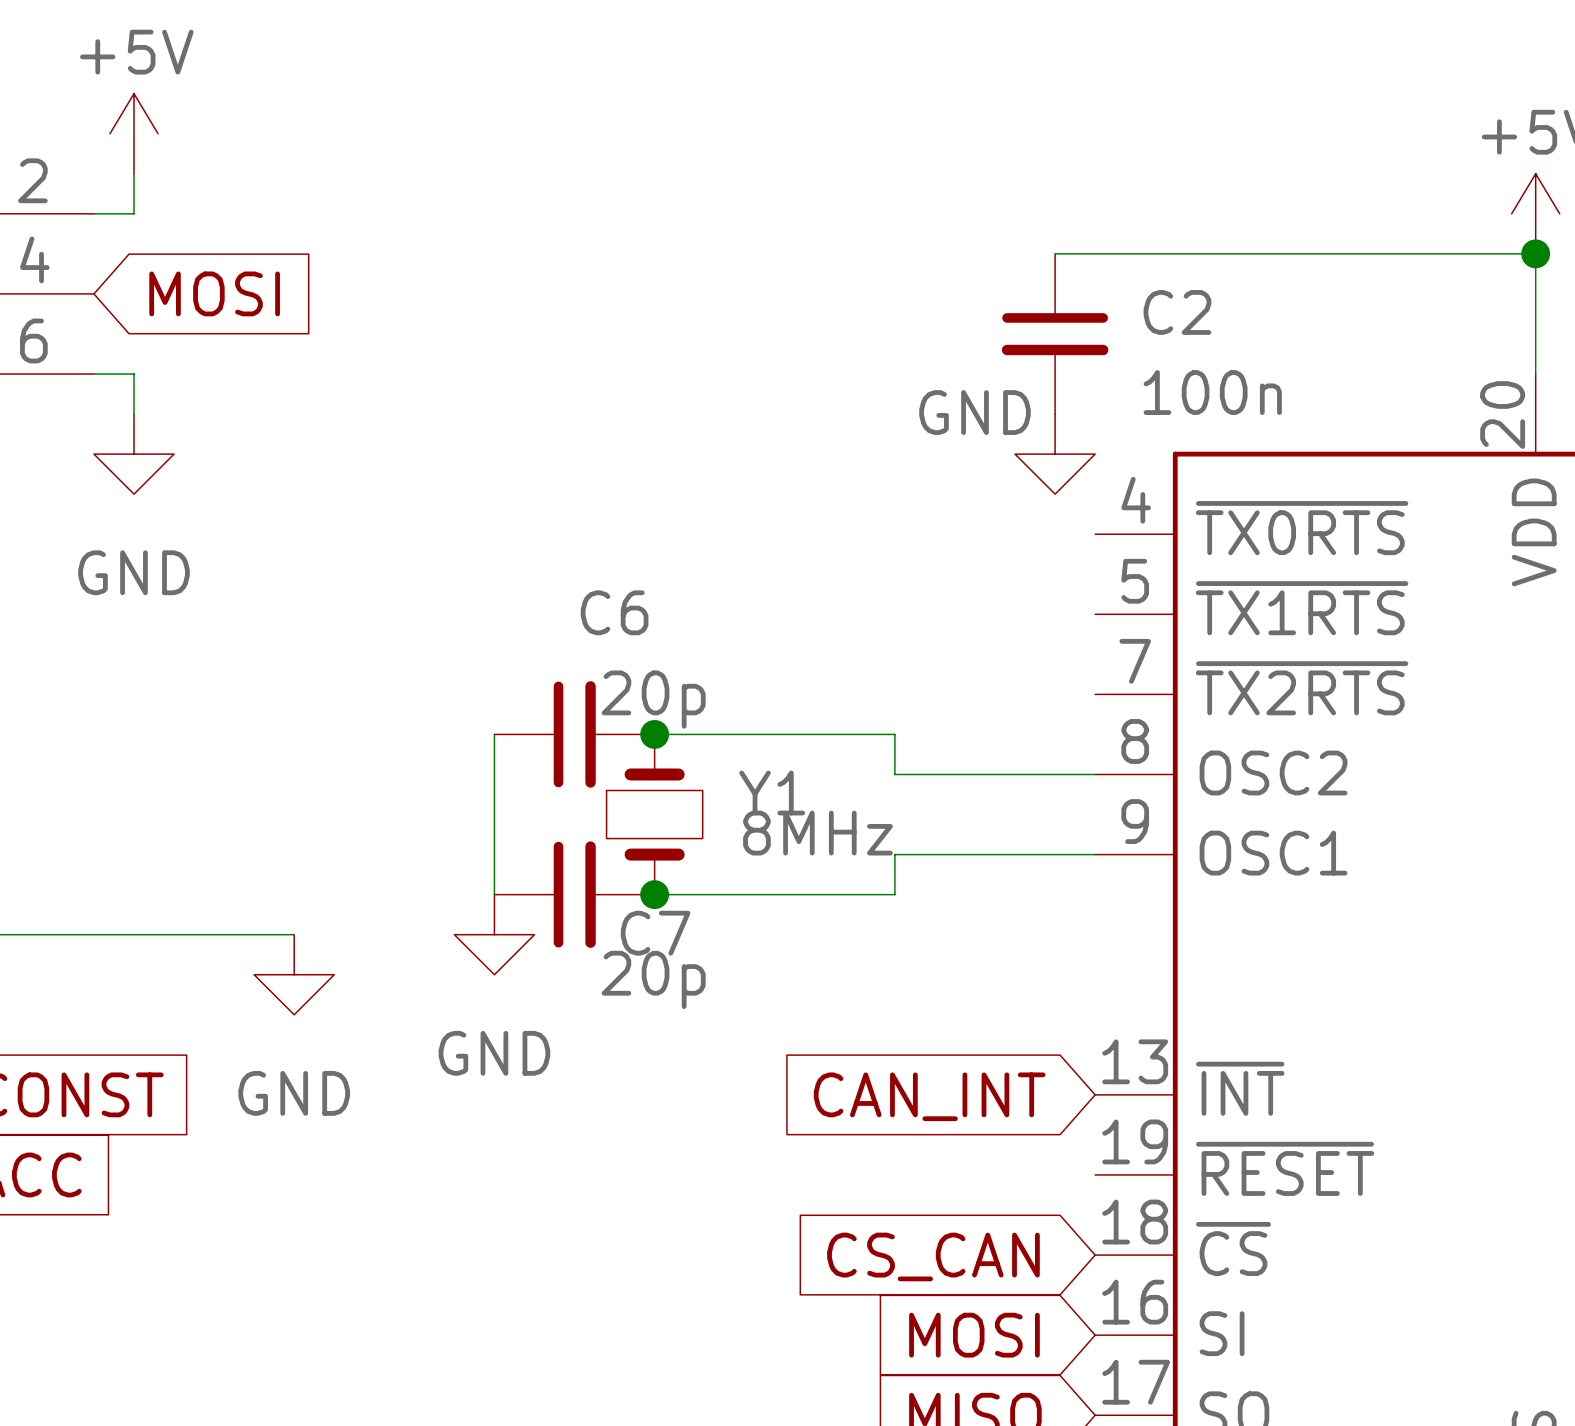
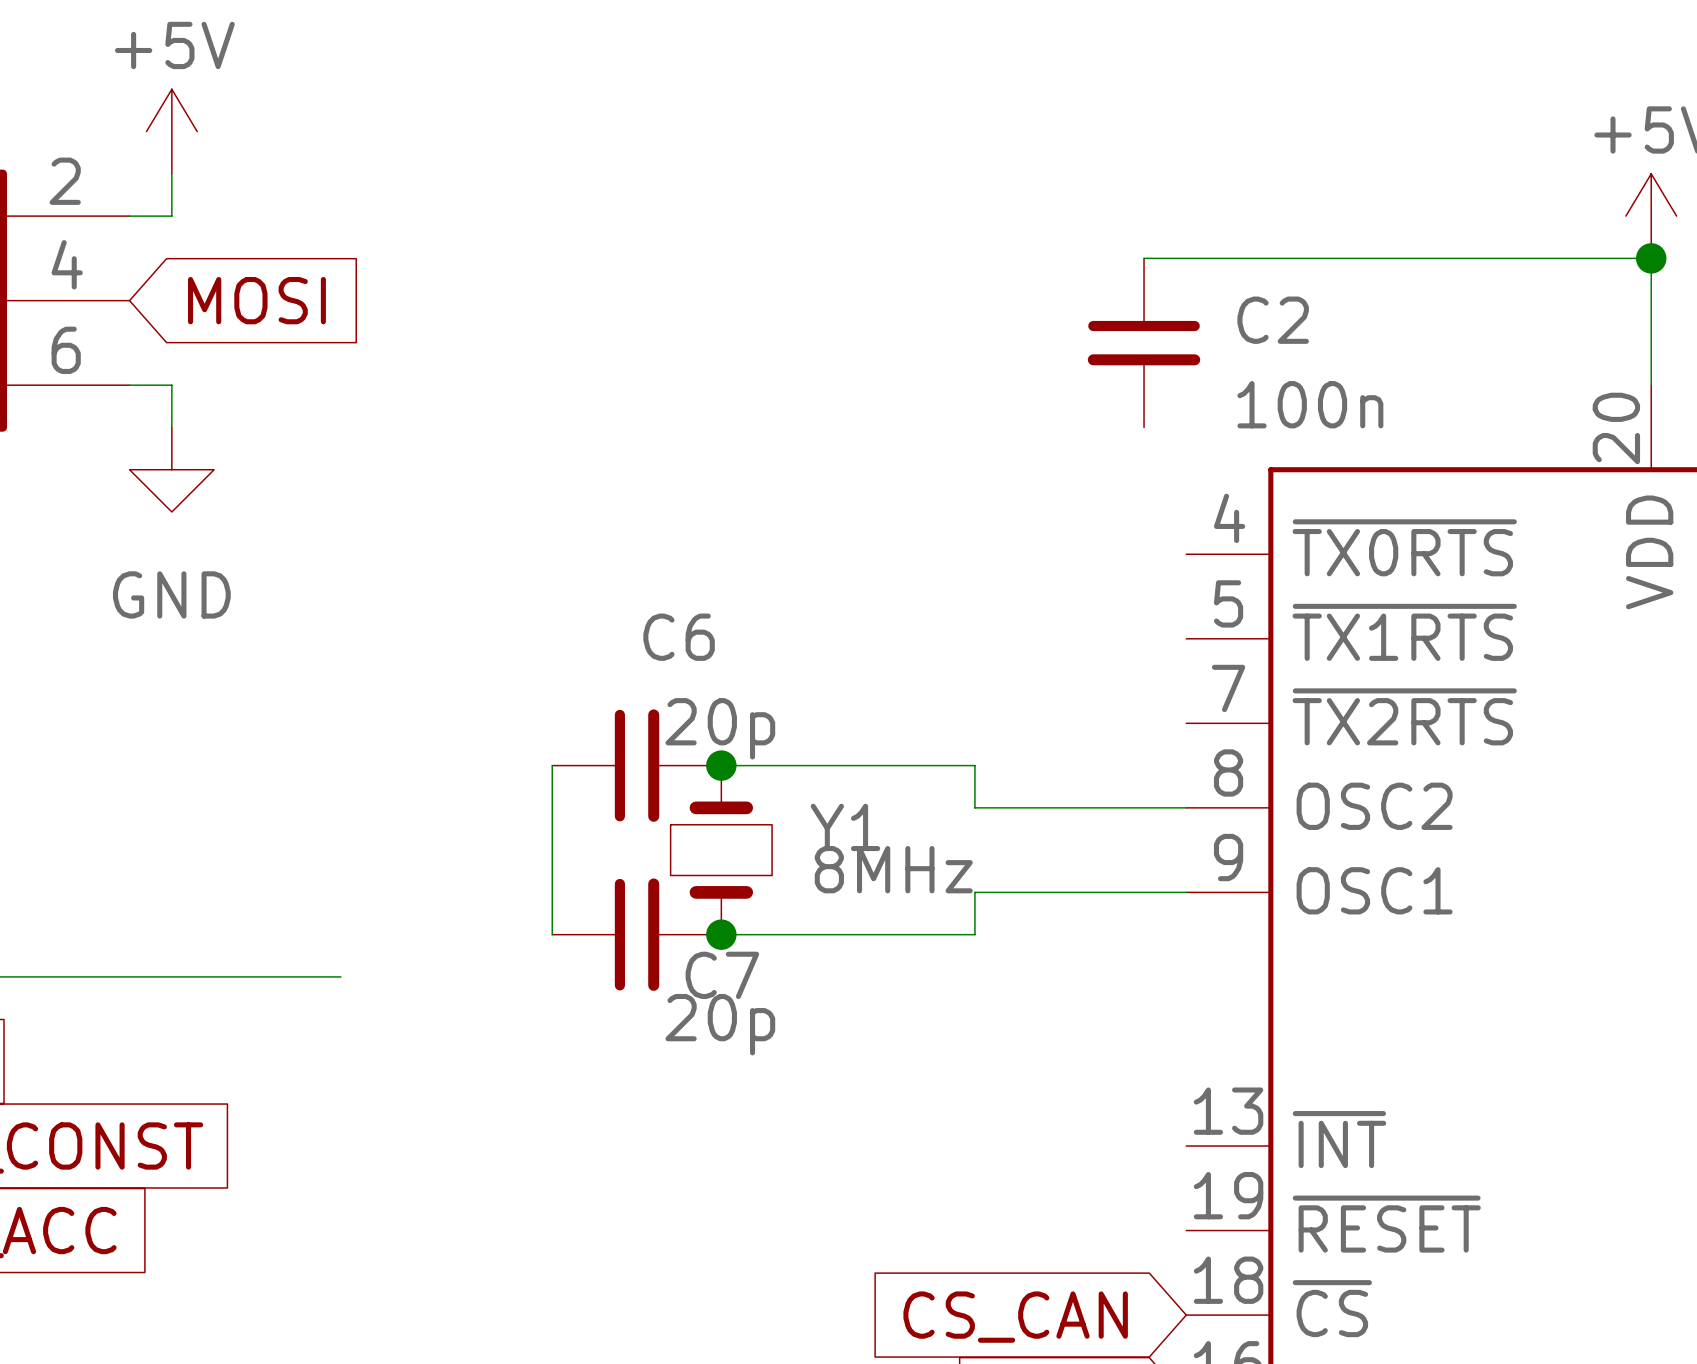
power symbol: GND (1055, 454) -> none
power symbol: GND (494, 934) -> none
power symbol: GND (294, 974) -> none
global label: CAN_INT (929, 1096) -> none

